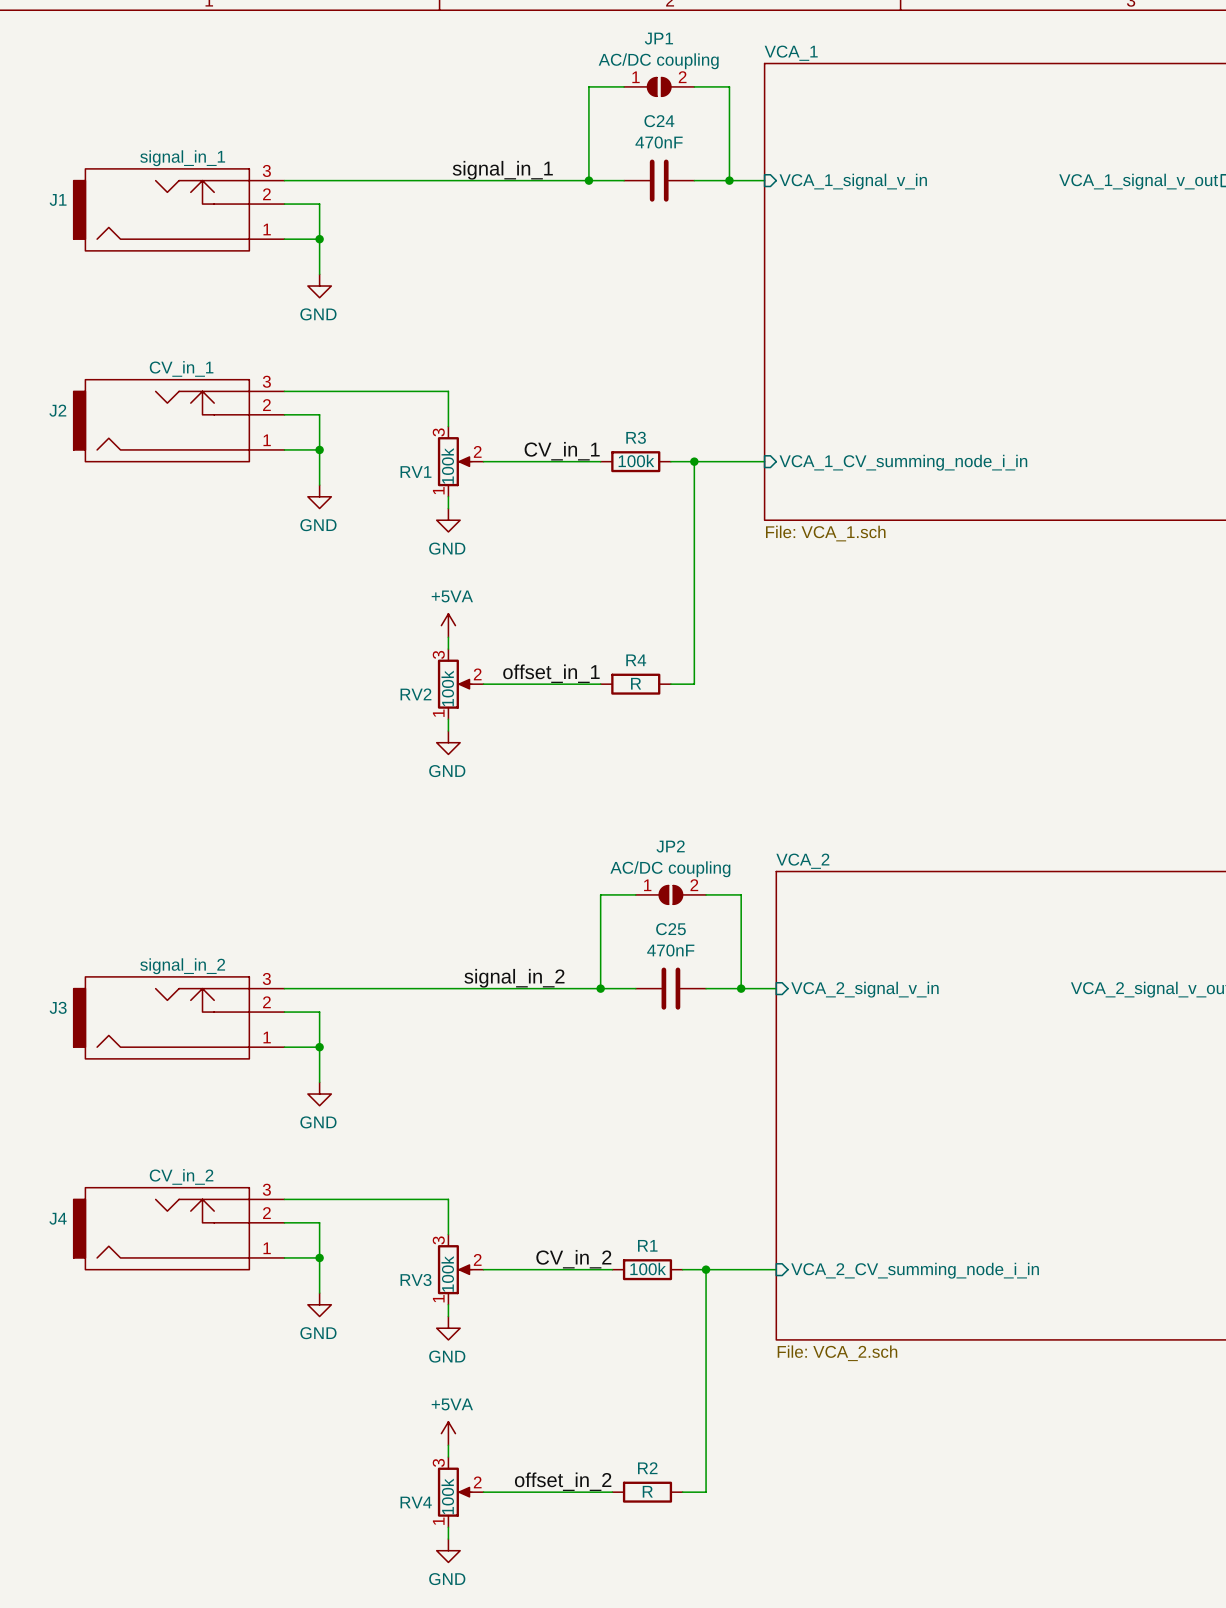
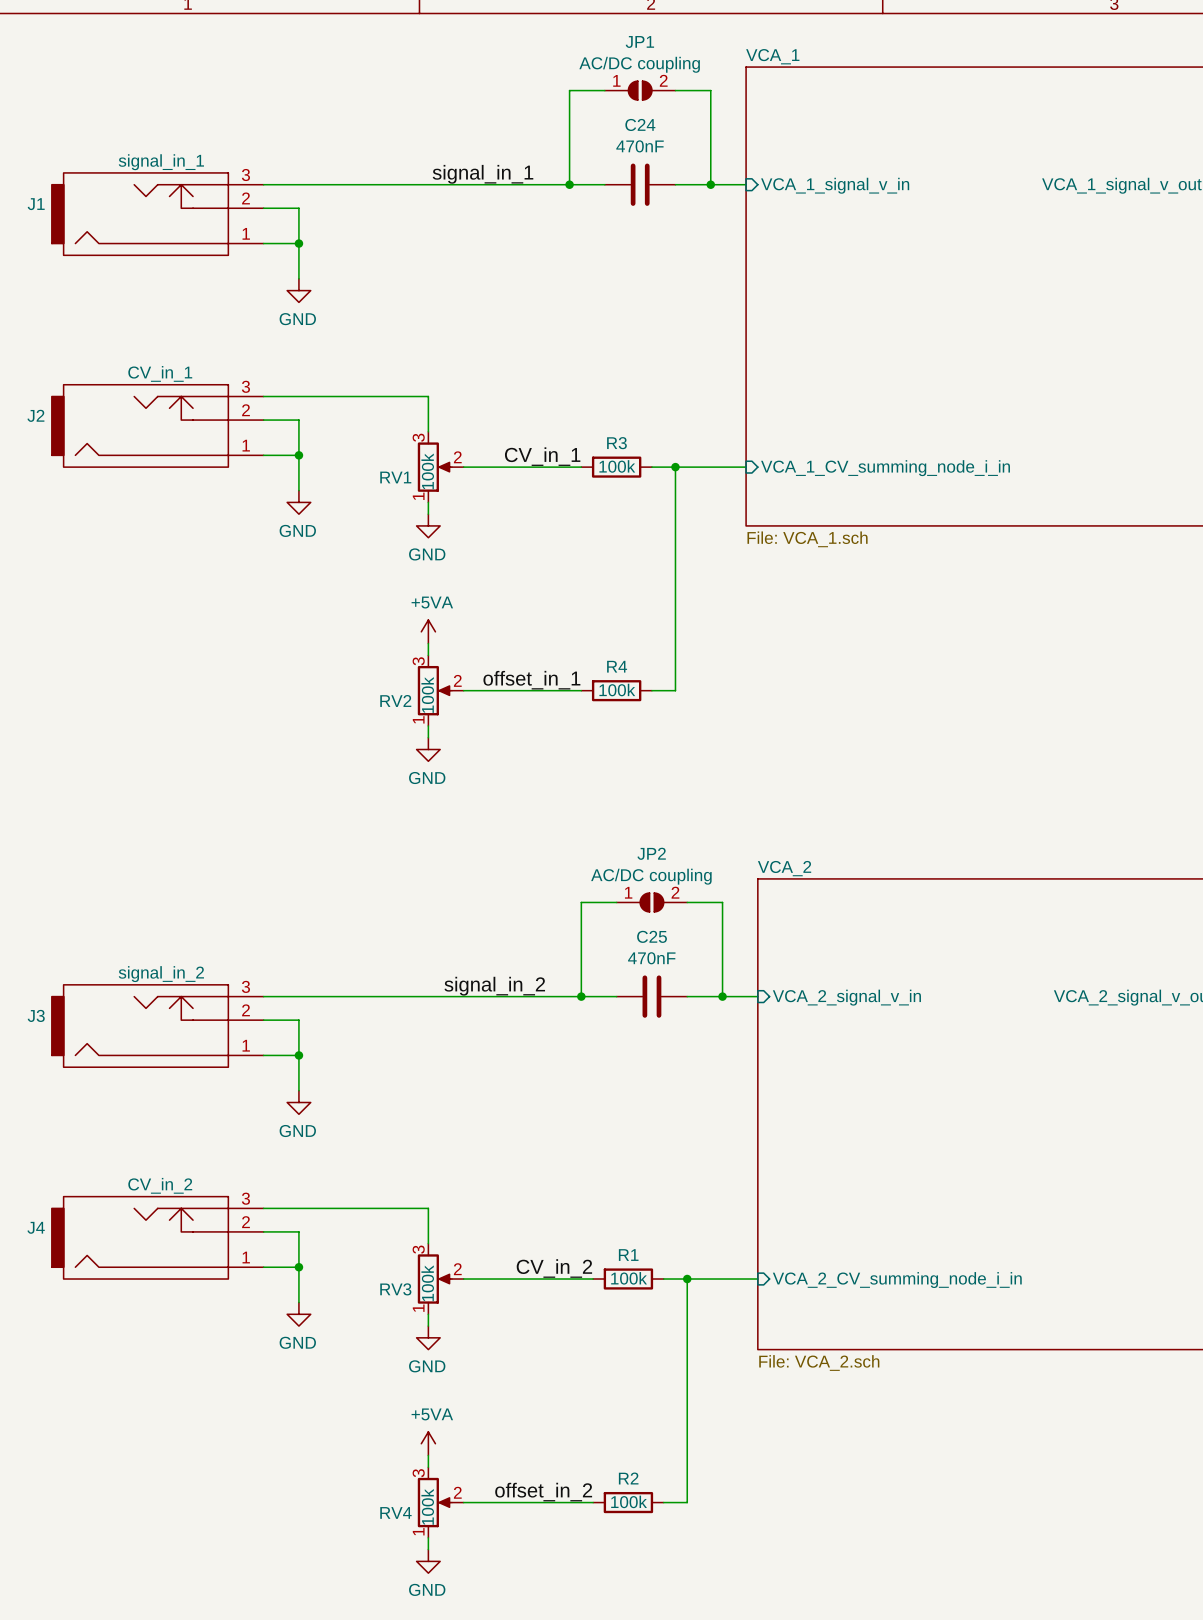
R4 value: R (636, 683) -> 100k (617, 690)
R2 value: R (647, 1491) -> 100k (629, 1501)

